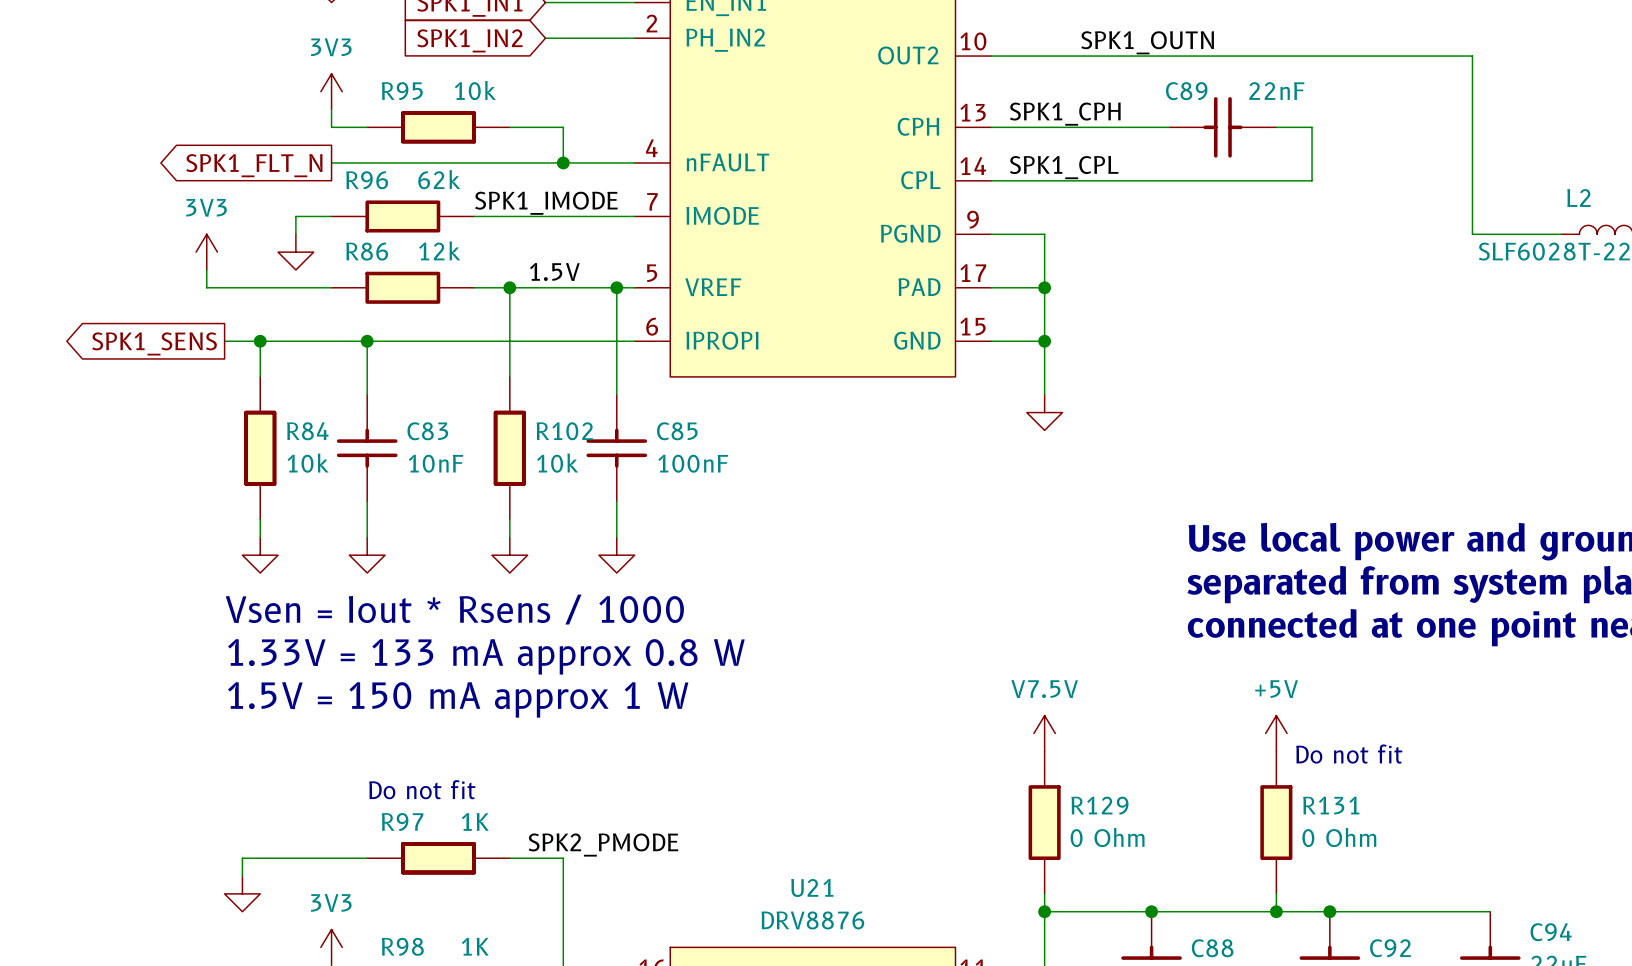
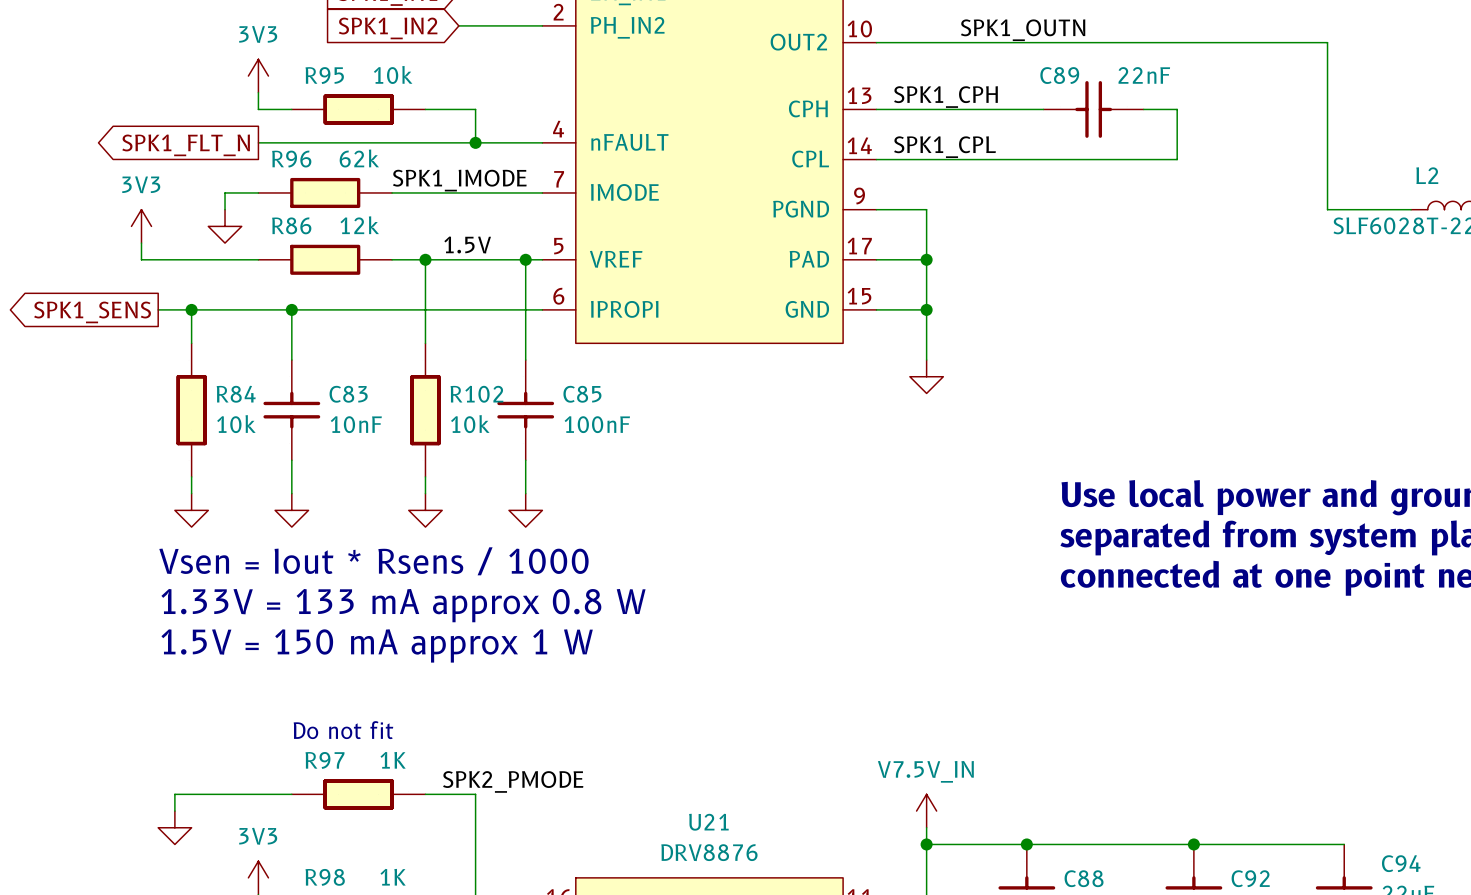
power symbol: V7.5V (1044, 733) -> none
power symbol: +5V (1276, 733) -> none
text: Do not fit (1349, 754) -> none
R129: (1044, 822) -> none
R131: (1276, 822) -> none
power symbol: none -> V7.5V_IN (926, 811)
wire: (1276, 893) (1276, 911) -> none
junction: (1276, 911) -> none

